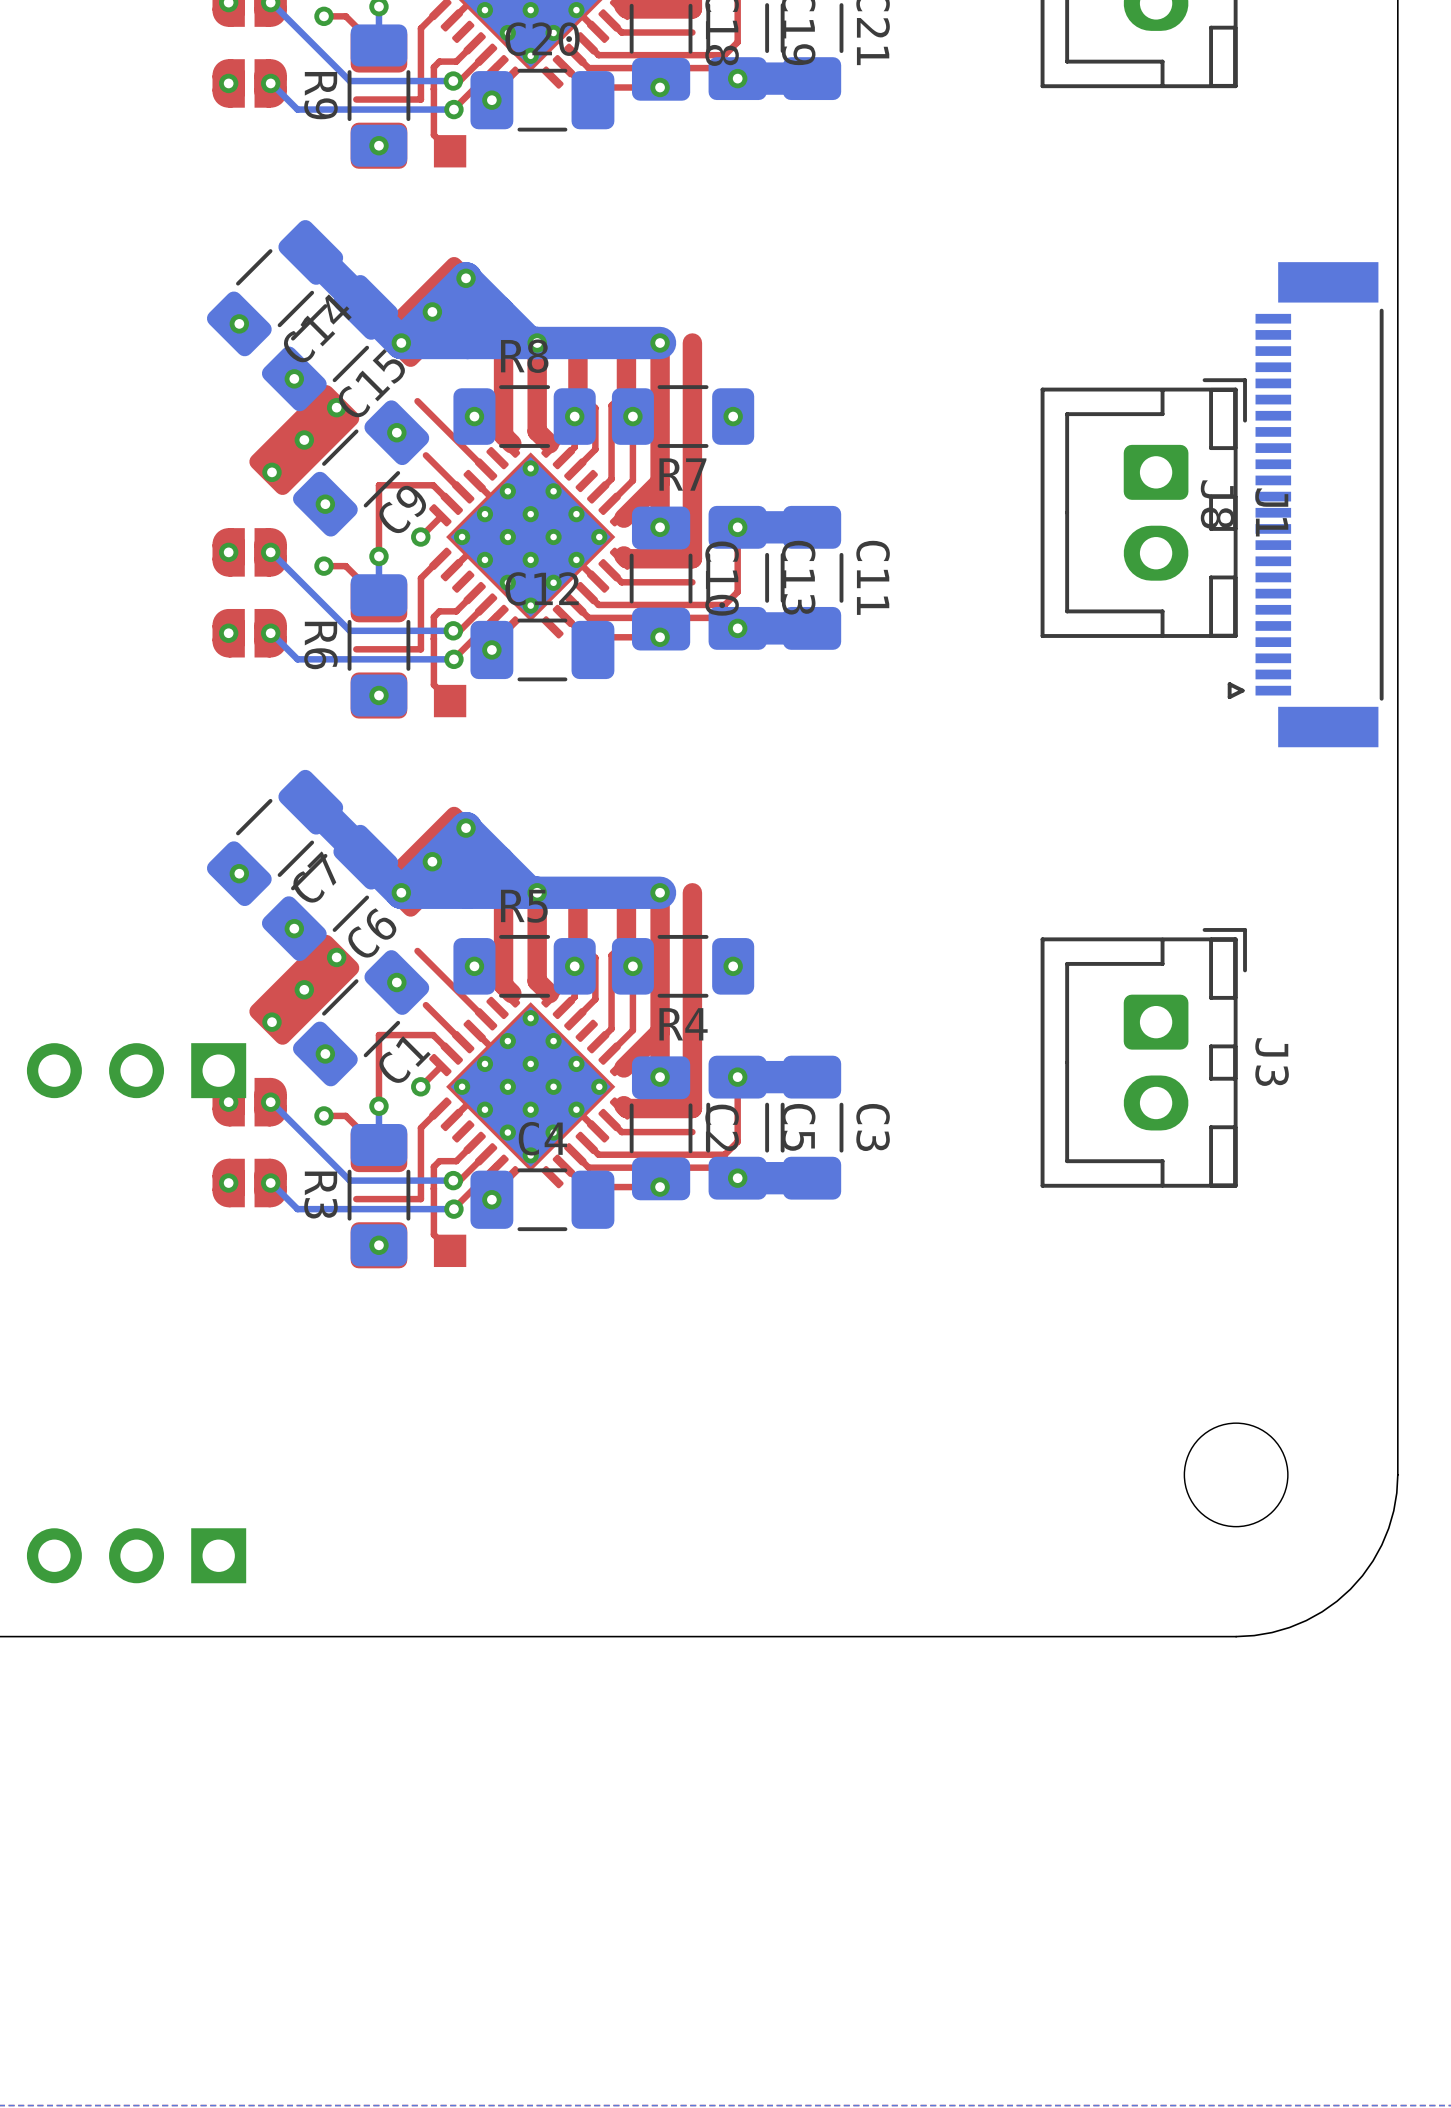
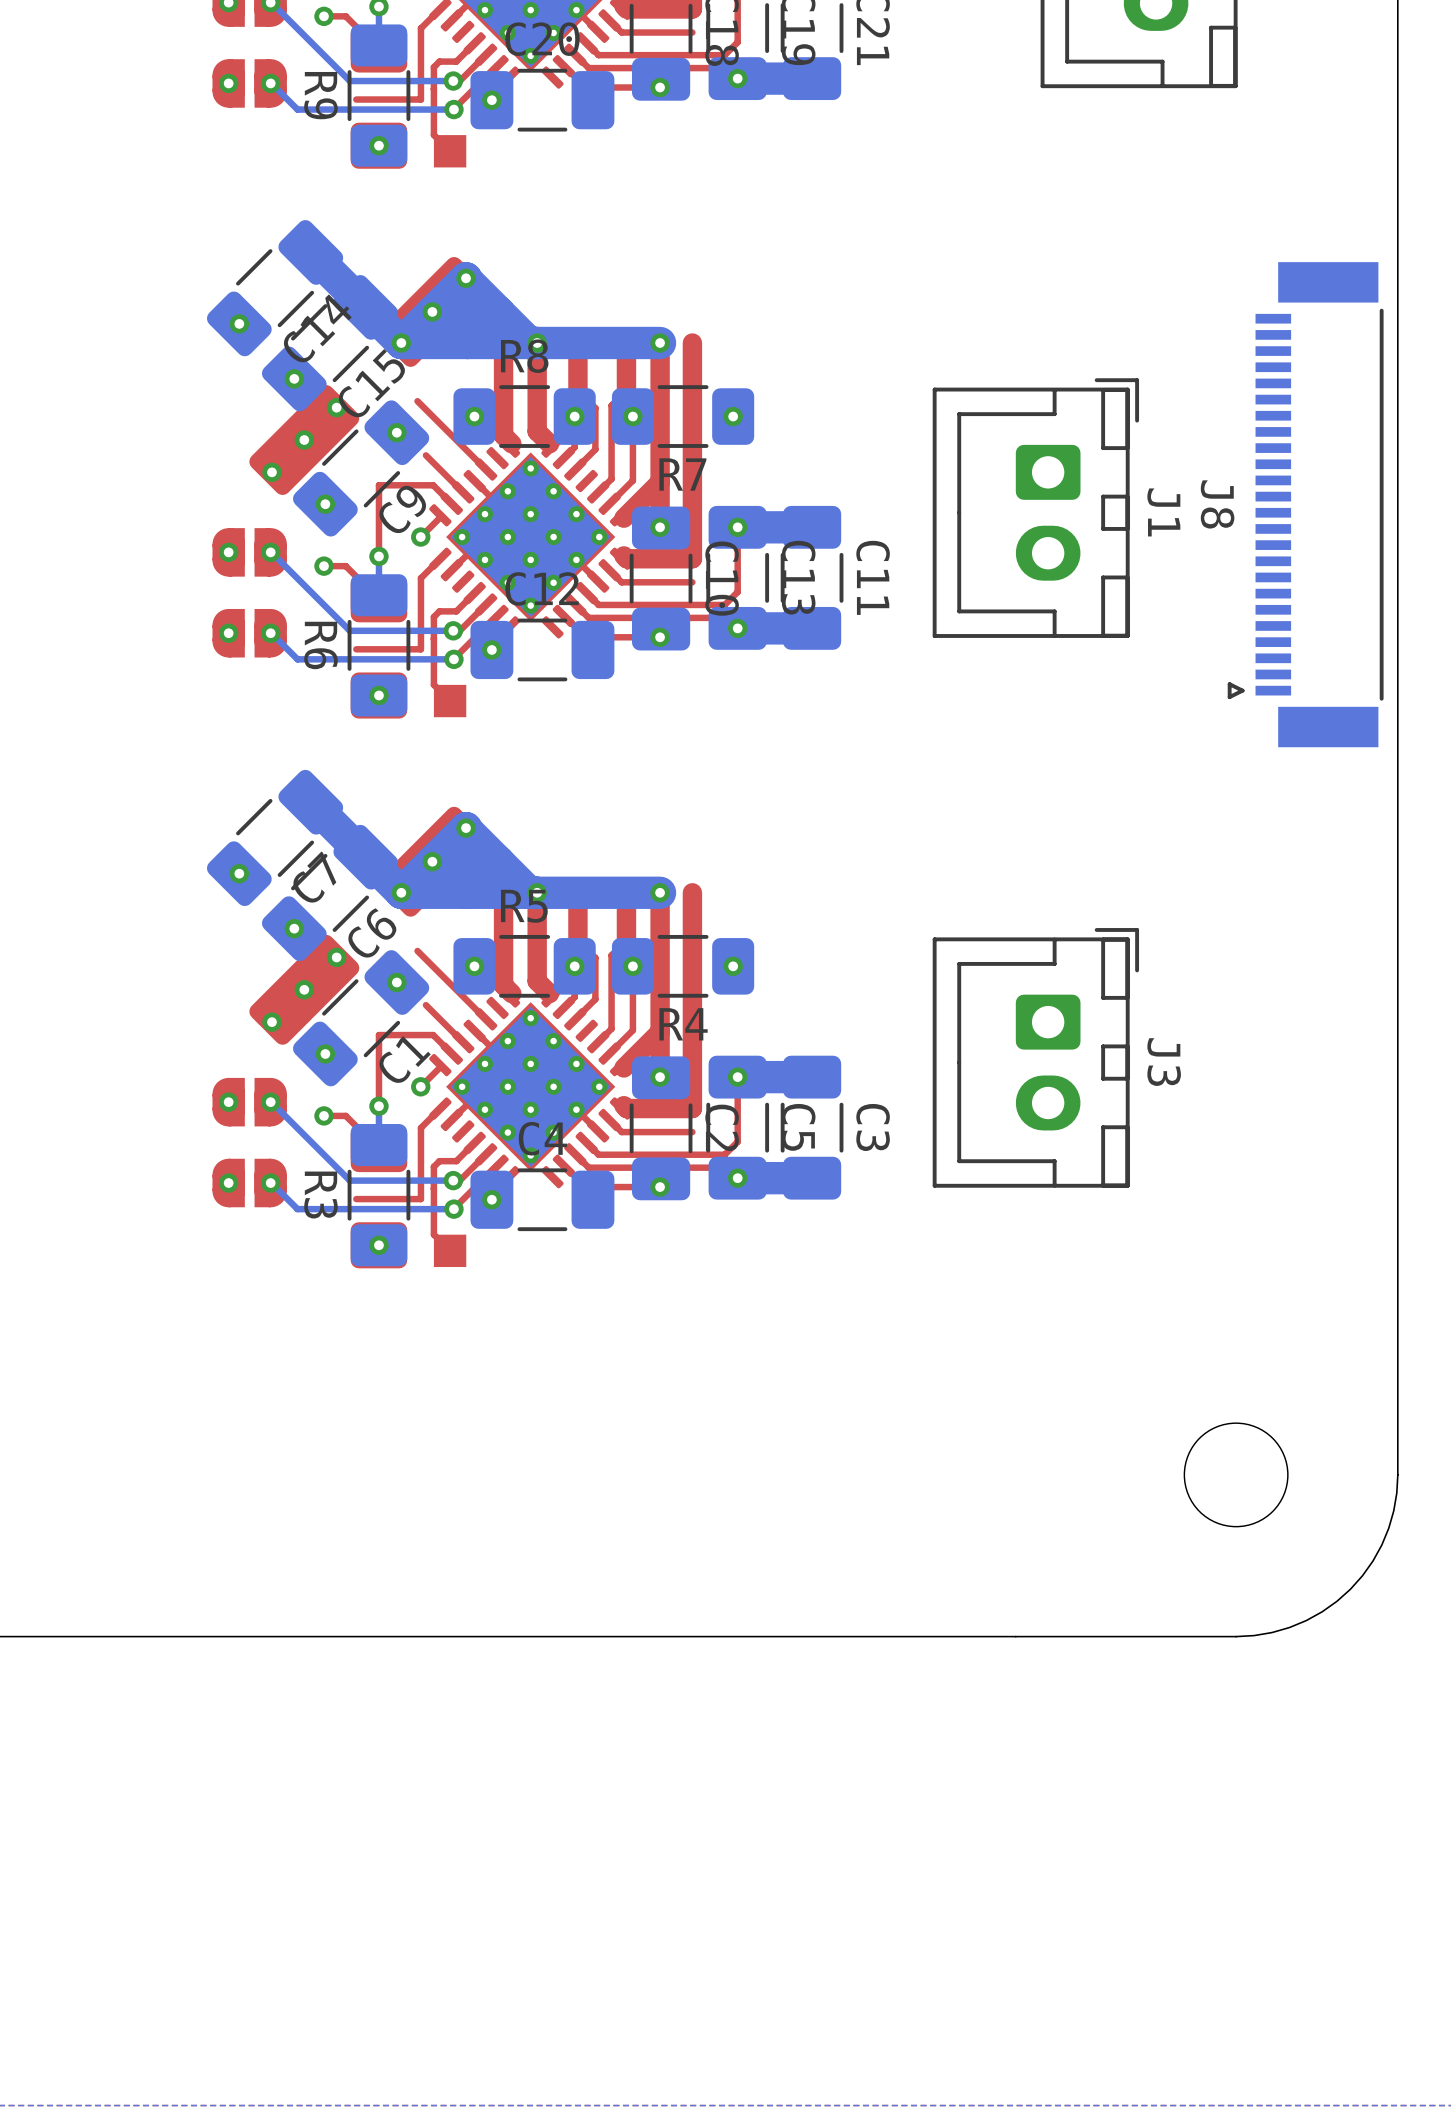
J1 position: (1143, 508) -> (1035, 508)
J3 position: (1143, 1057) -> (1035, 1057)
part: (136, 1070) -> none
part: (136, 1555) -> none

